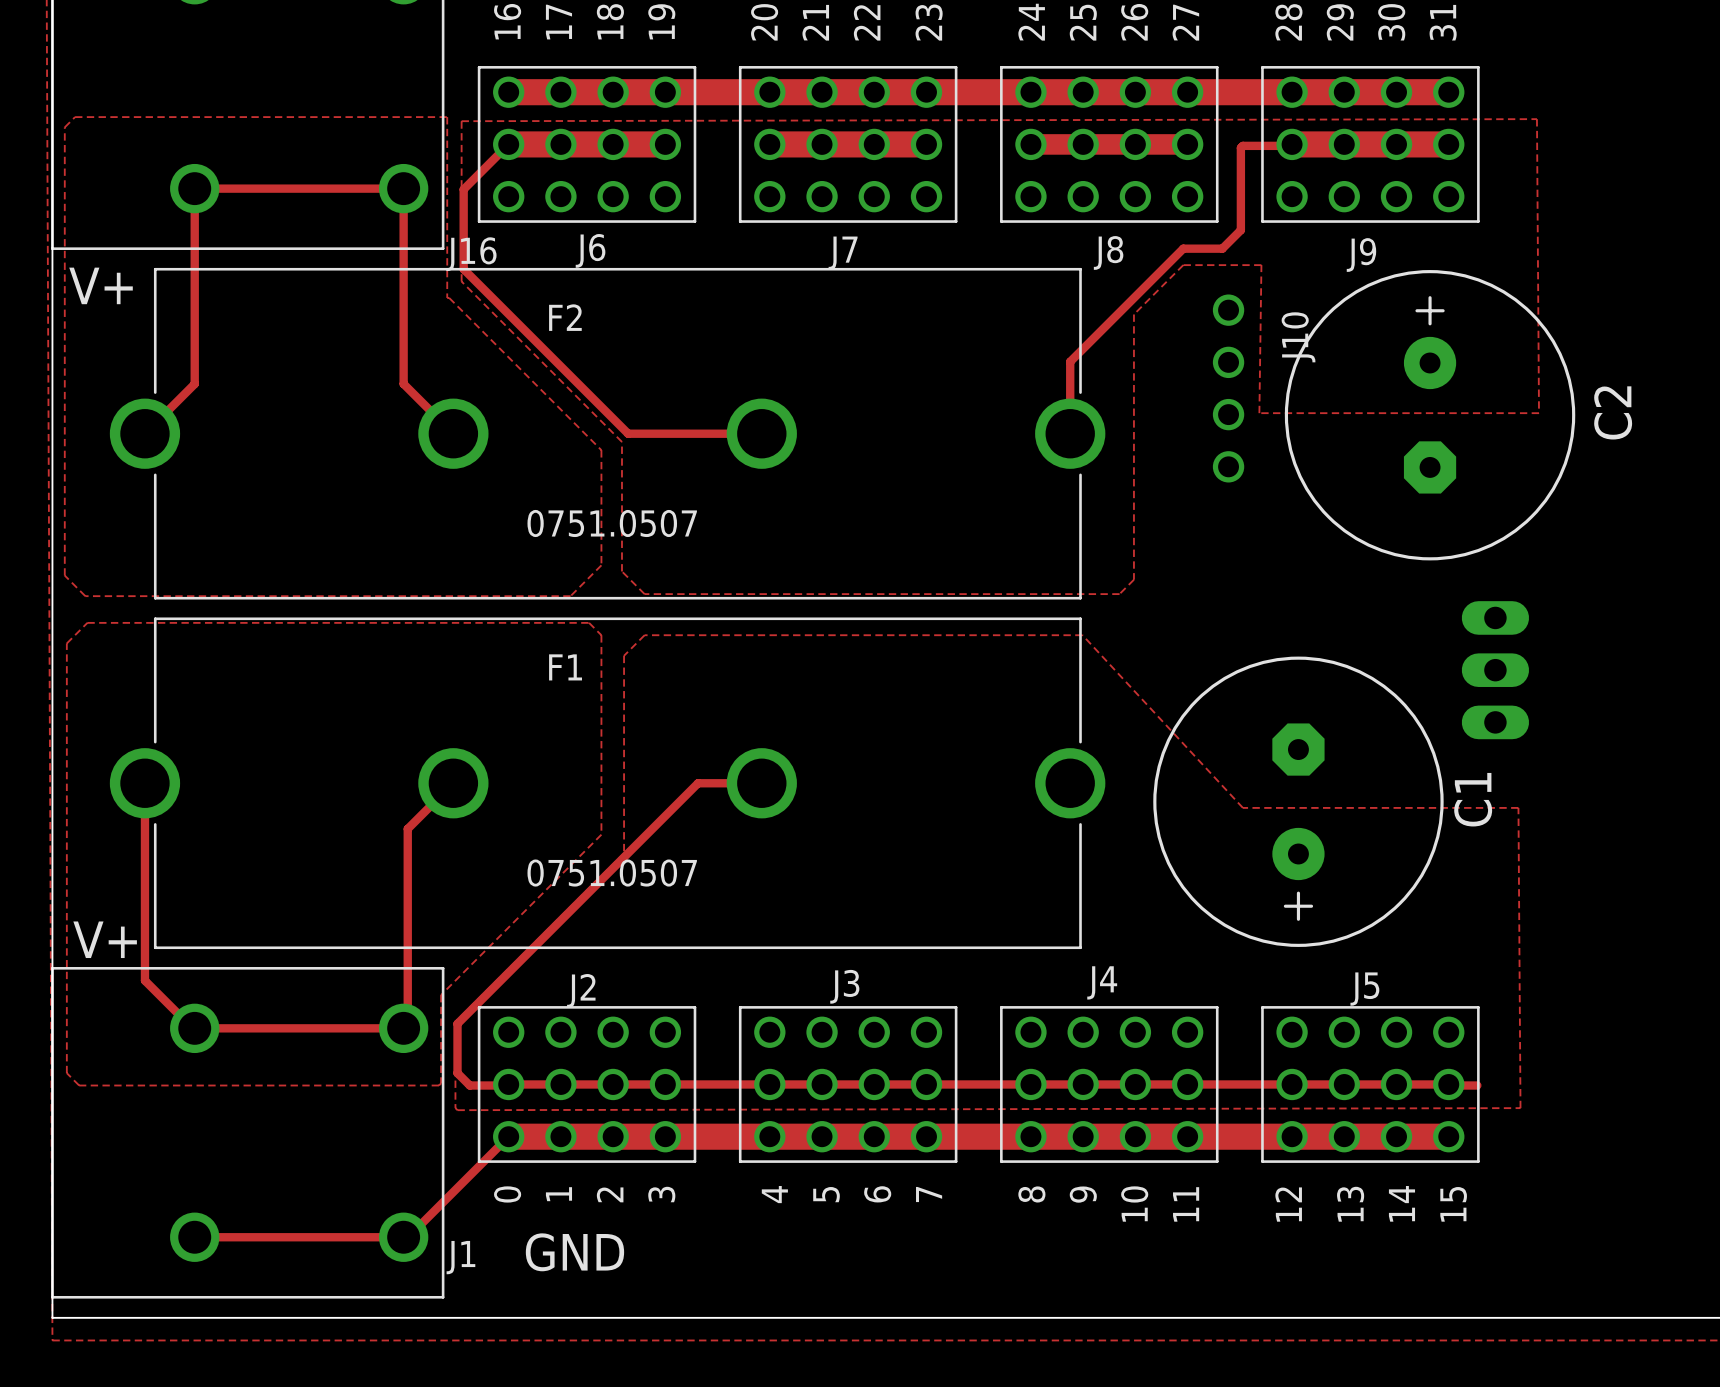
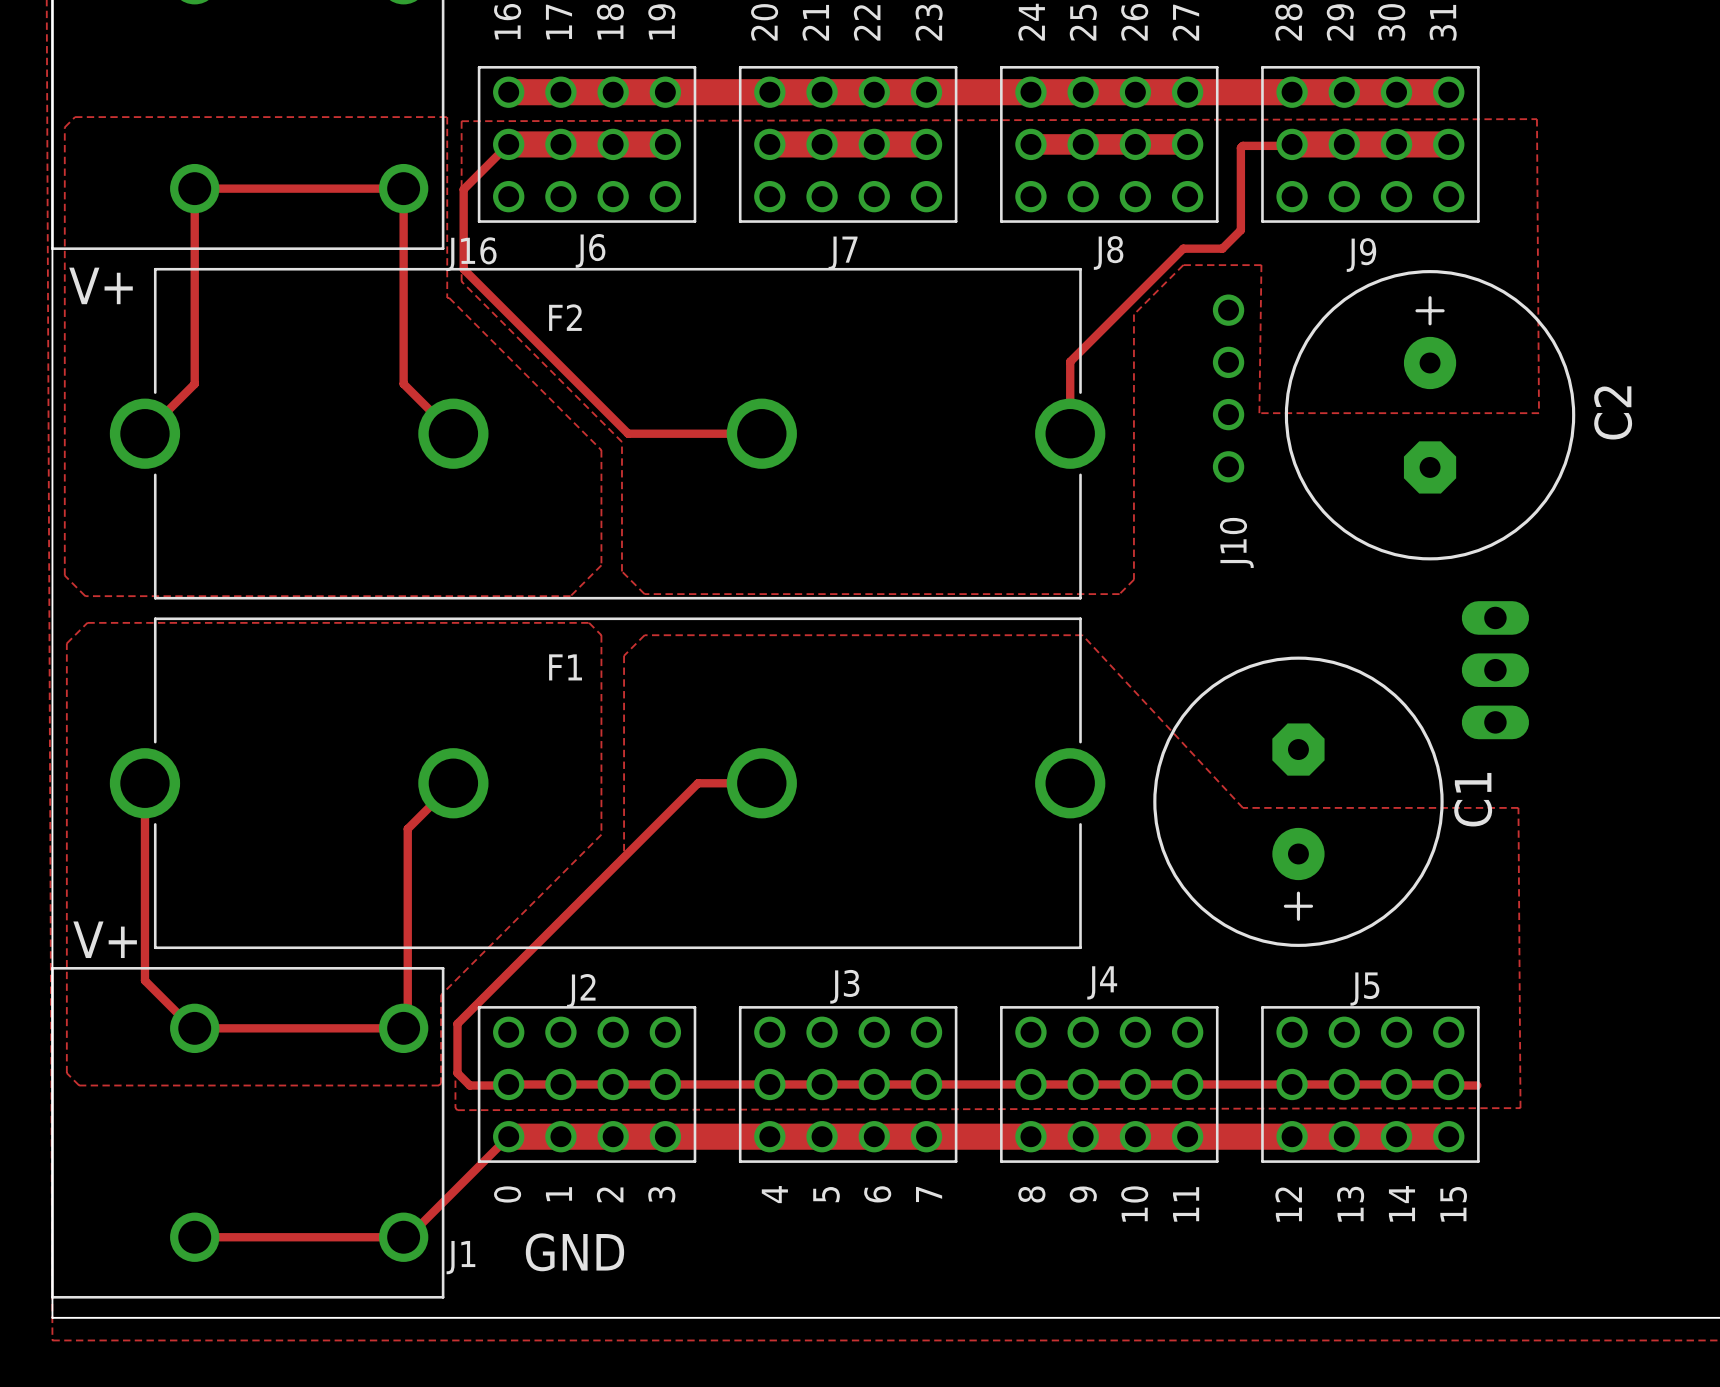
J10 name position: J10 (1298, 337) -> J10 (1236, 542)
F2 value: 0751.0507 (612, 523) -> none
F1 value: 0751.0507 (612, 873) -> none

